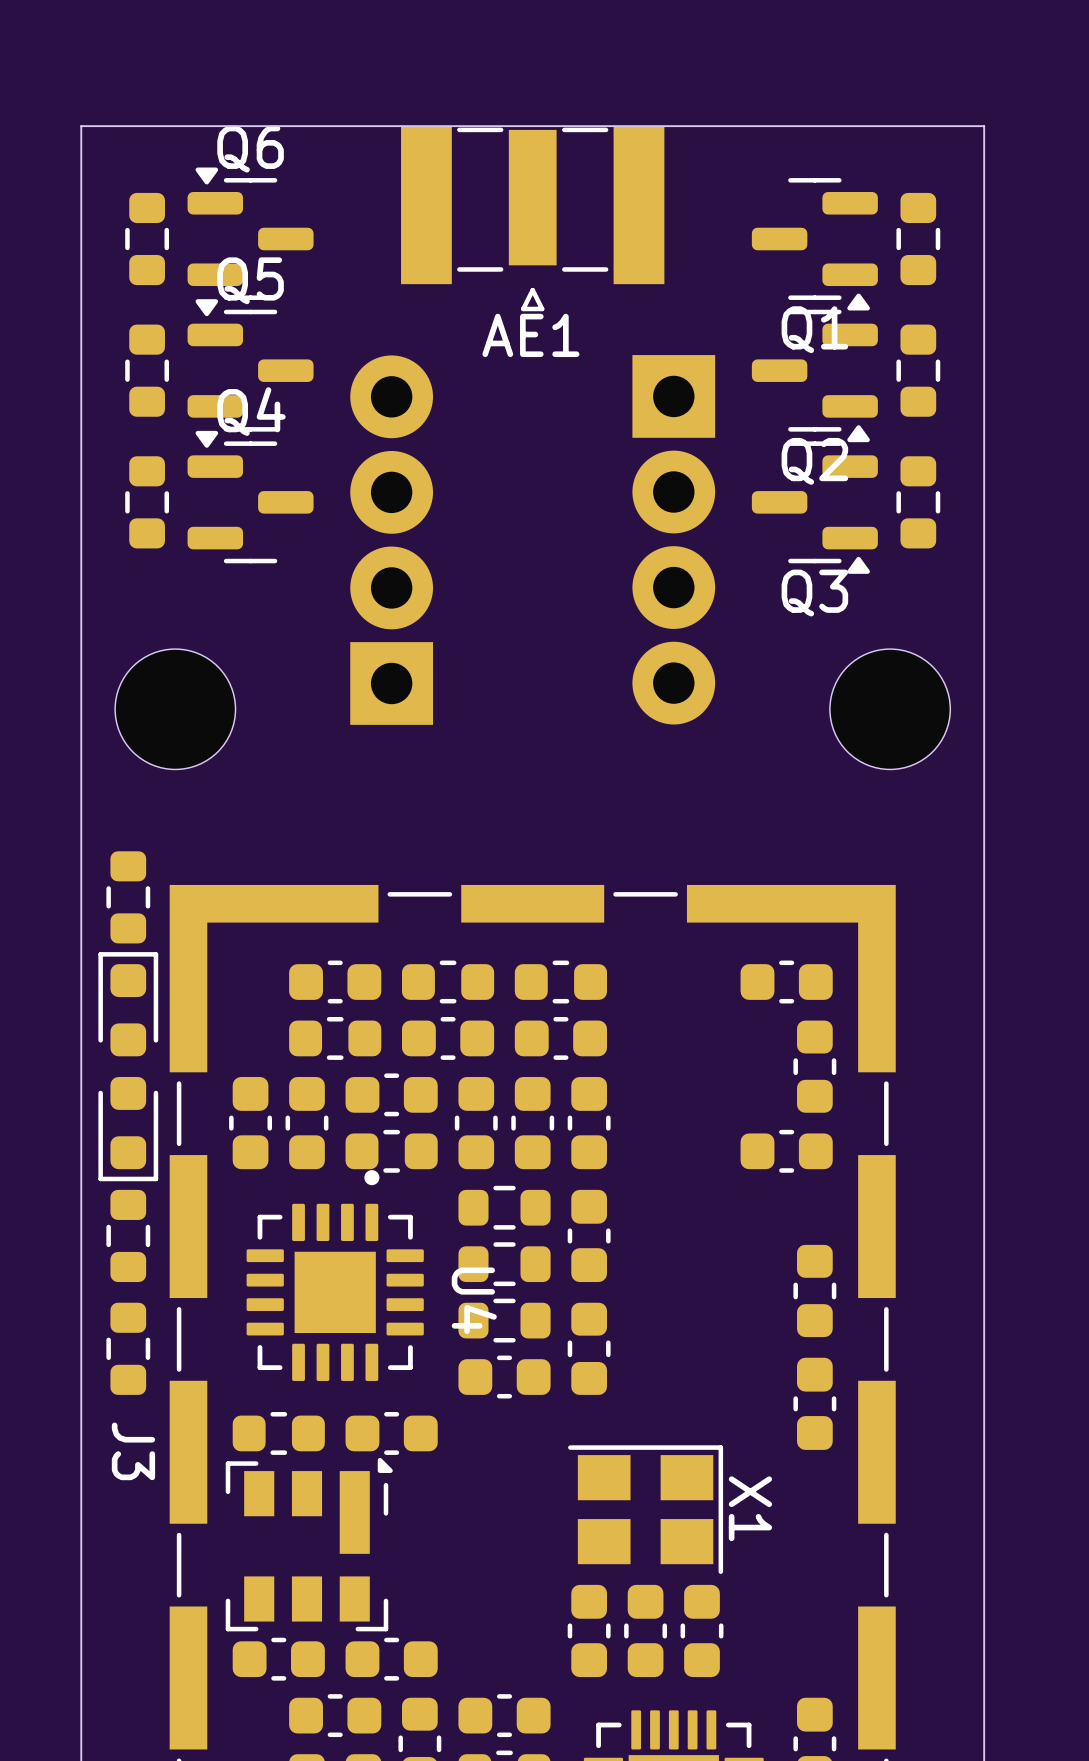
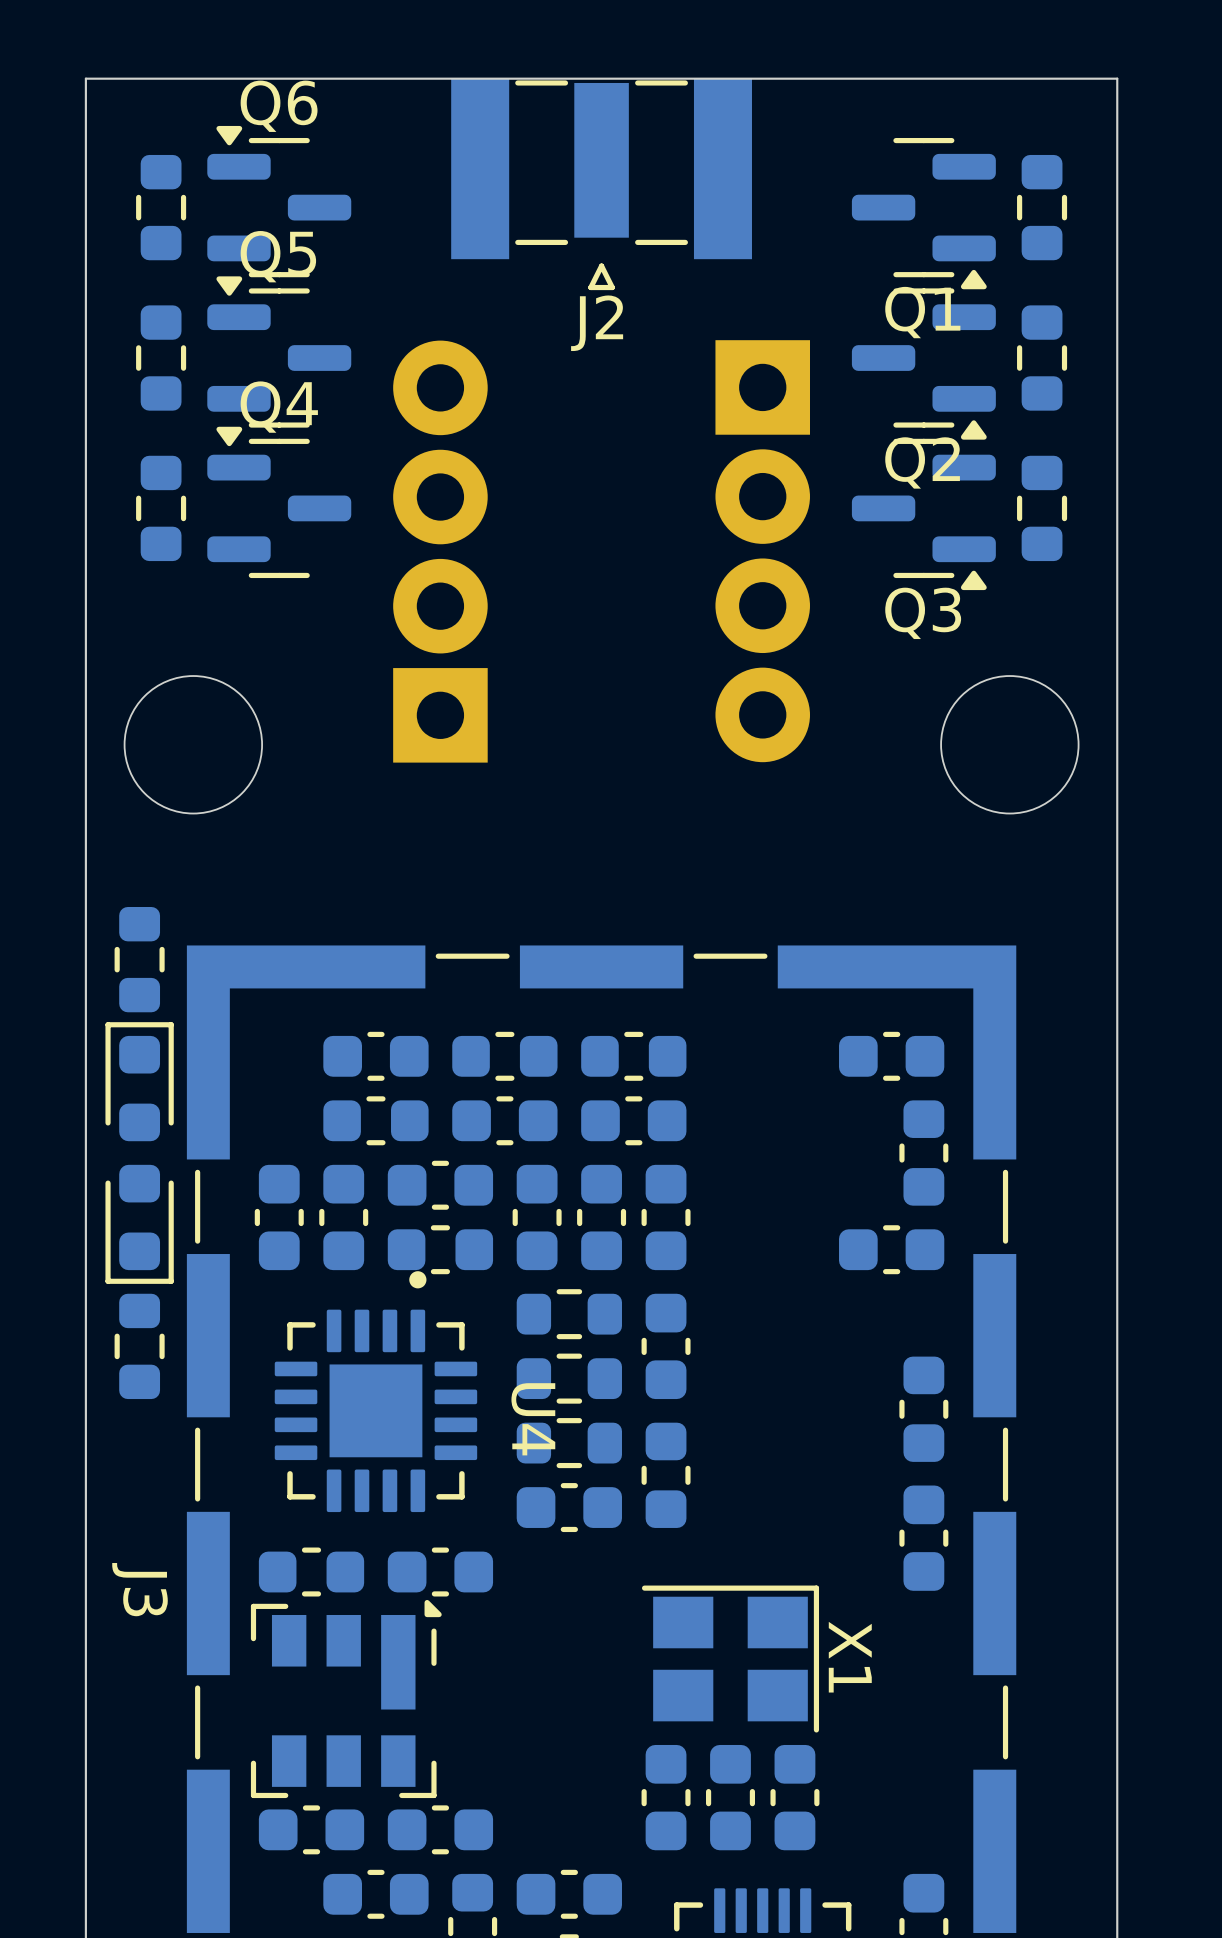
AE1 name: AE1 (530, 335) -> J2 (597, 323)
part: (128, 1348) -> none

